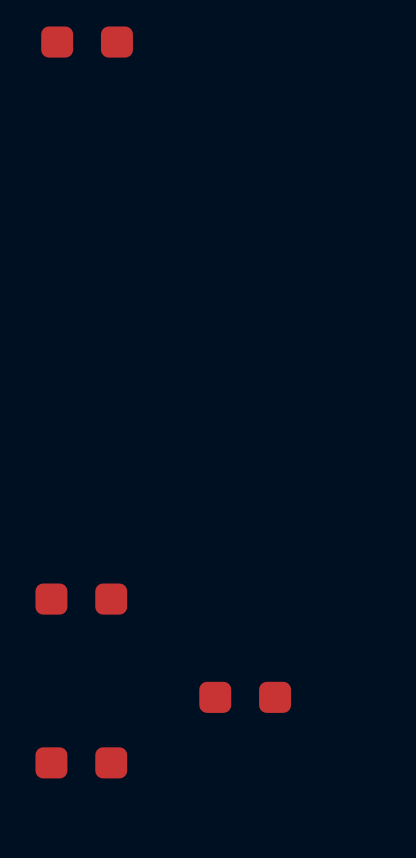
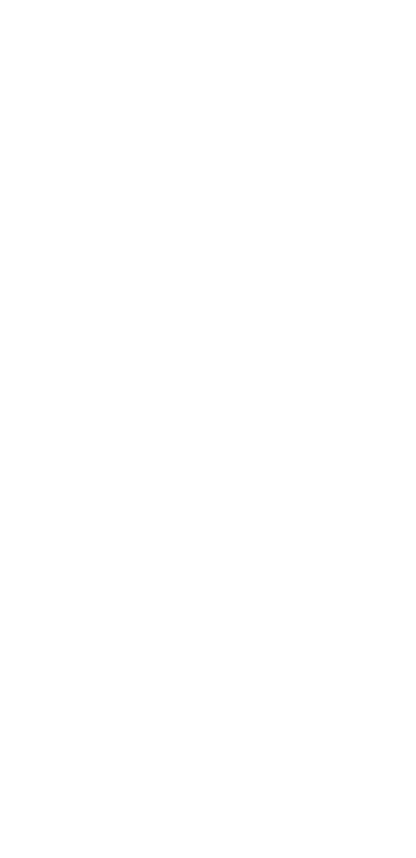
part: (87, 42) -> none
part: (81, 599) -> none
part: (245, 697) -> none
part: (81, 762) -> none

